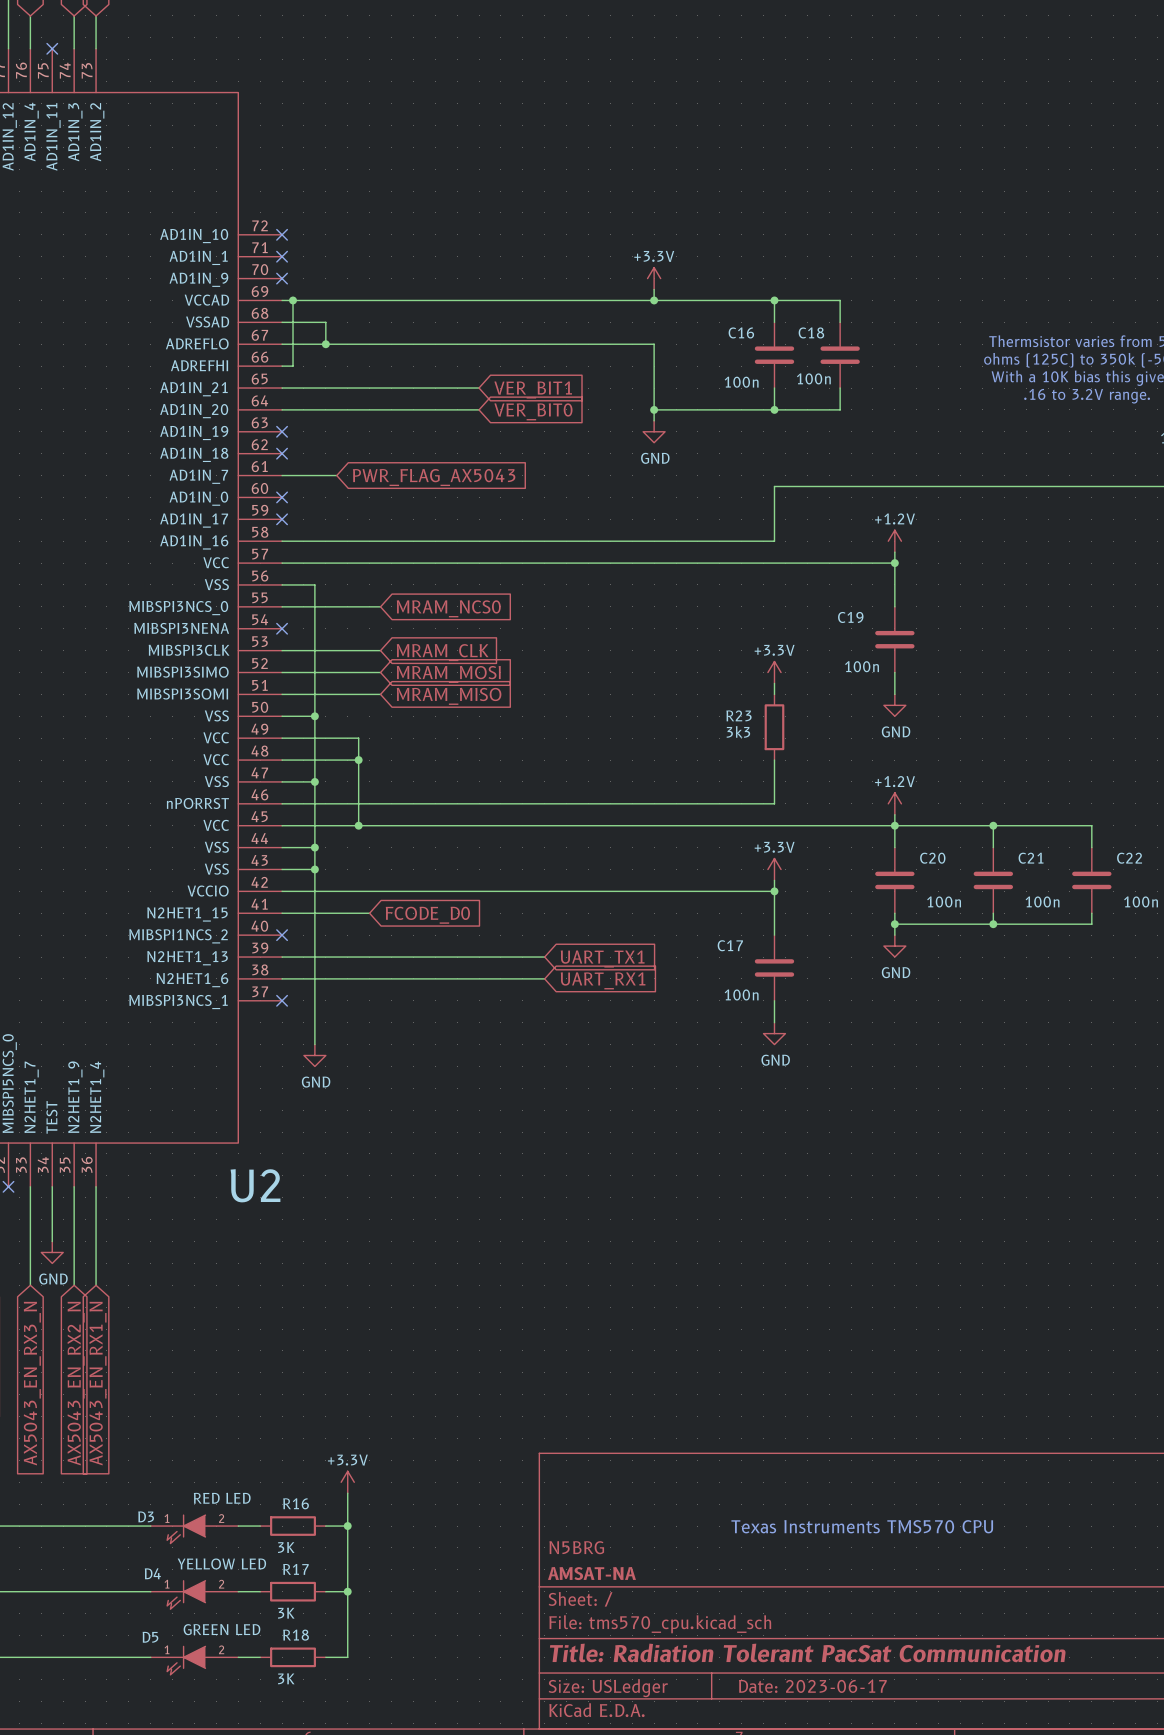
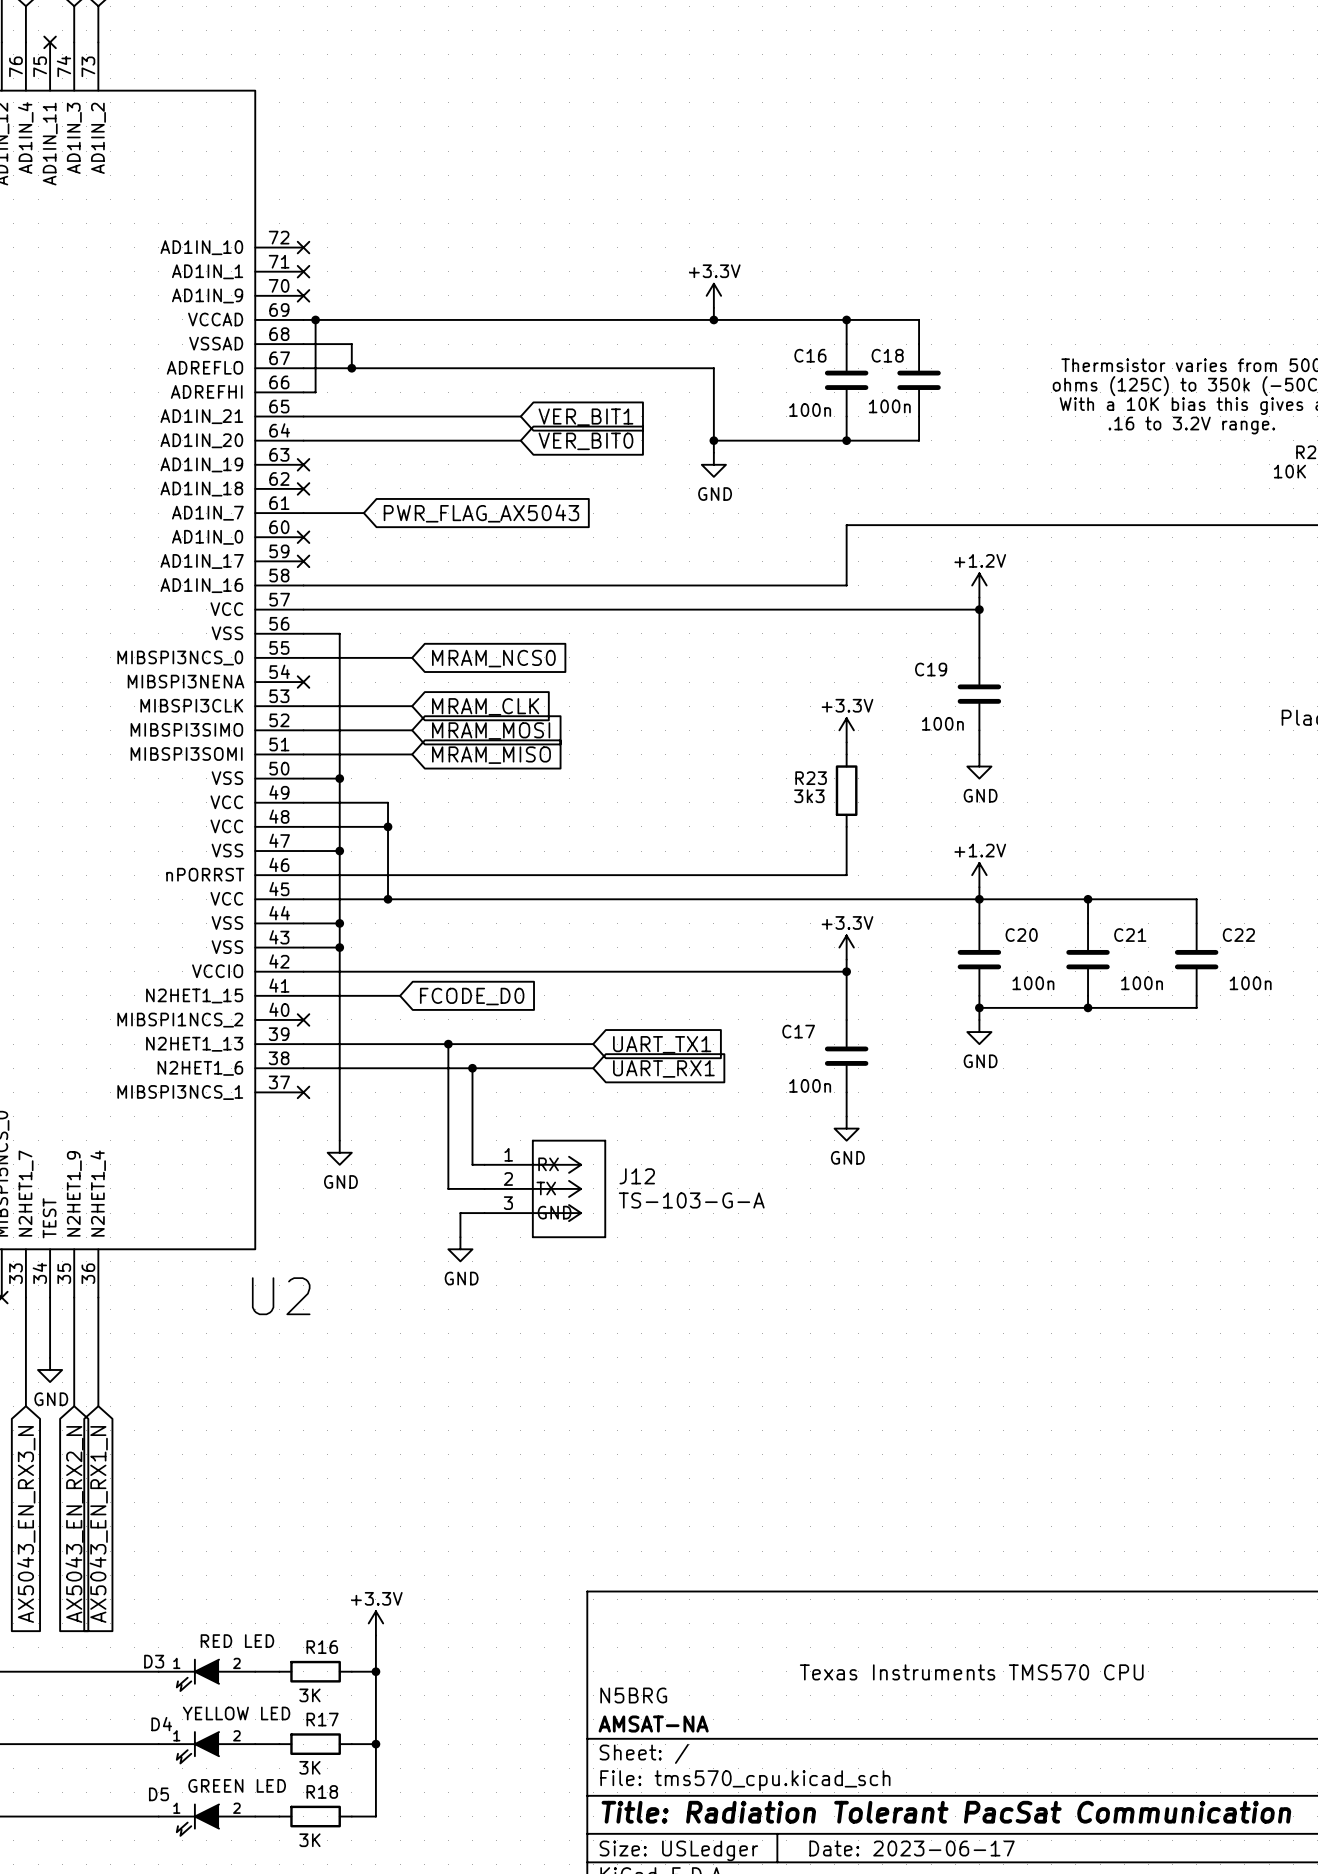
wire: none -> (448, 1044) (448, 1188) (484, 1188)
junction: none -> (448, 1044)
wire: none -> (472, 1068) (472, 1164) (484, 1164)
junction: none -> (472, 1068)
J12: none -> TS-103-G-A (545, 1188)
wire: none -> (484, 1213) (460, 1213) (460, 1237)
power symbol: none -> GND (460, 1249)

